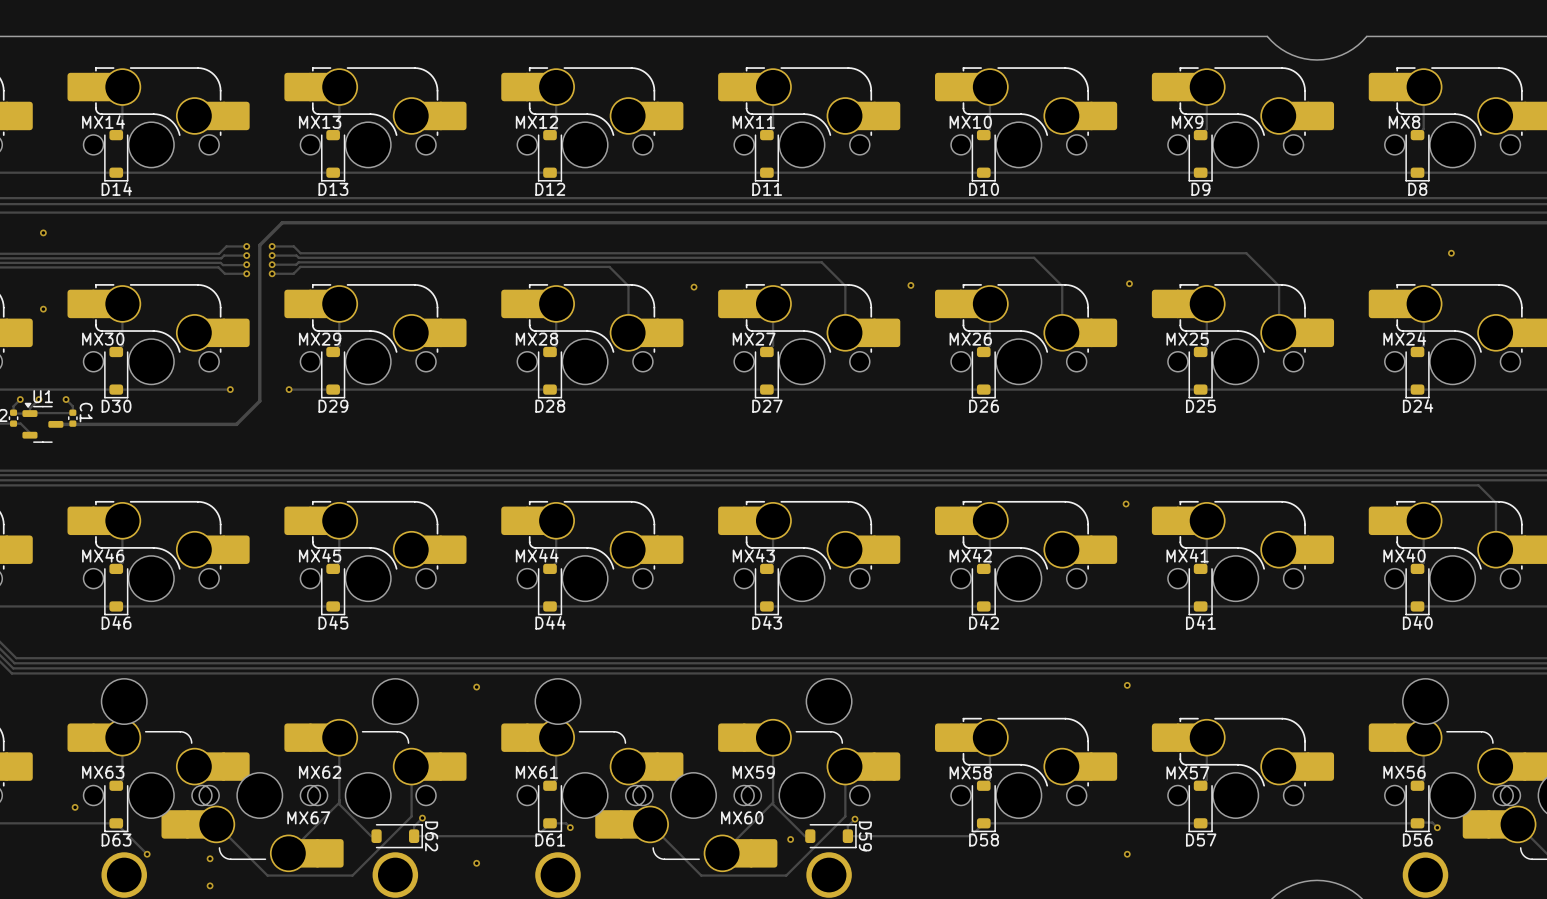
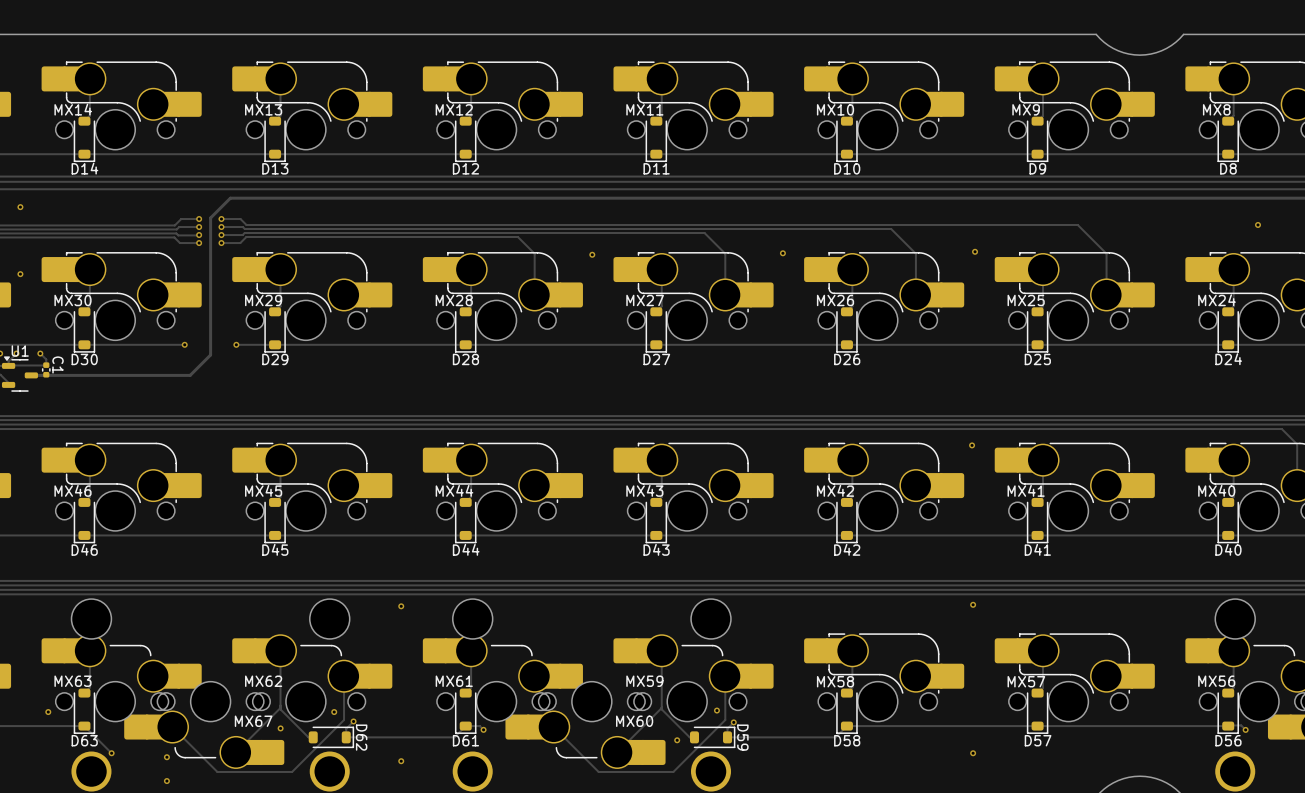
via: none -> (716, 710)
via: none -> (334, 712)
via: none -> (280, 728)

